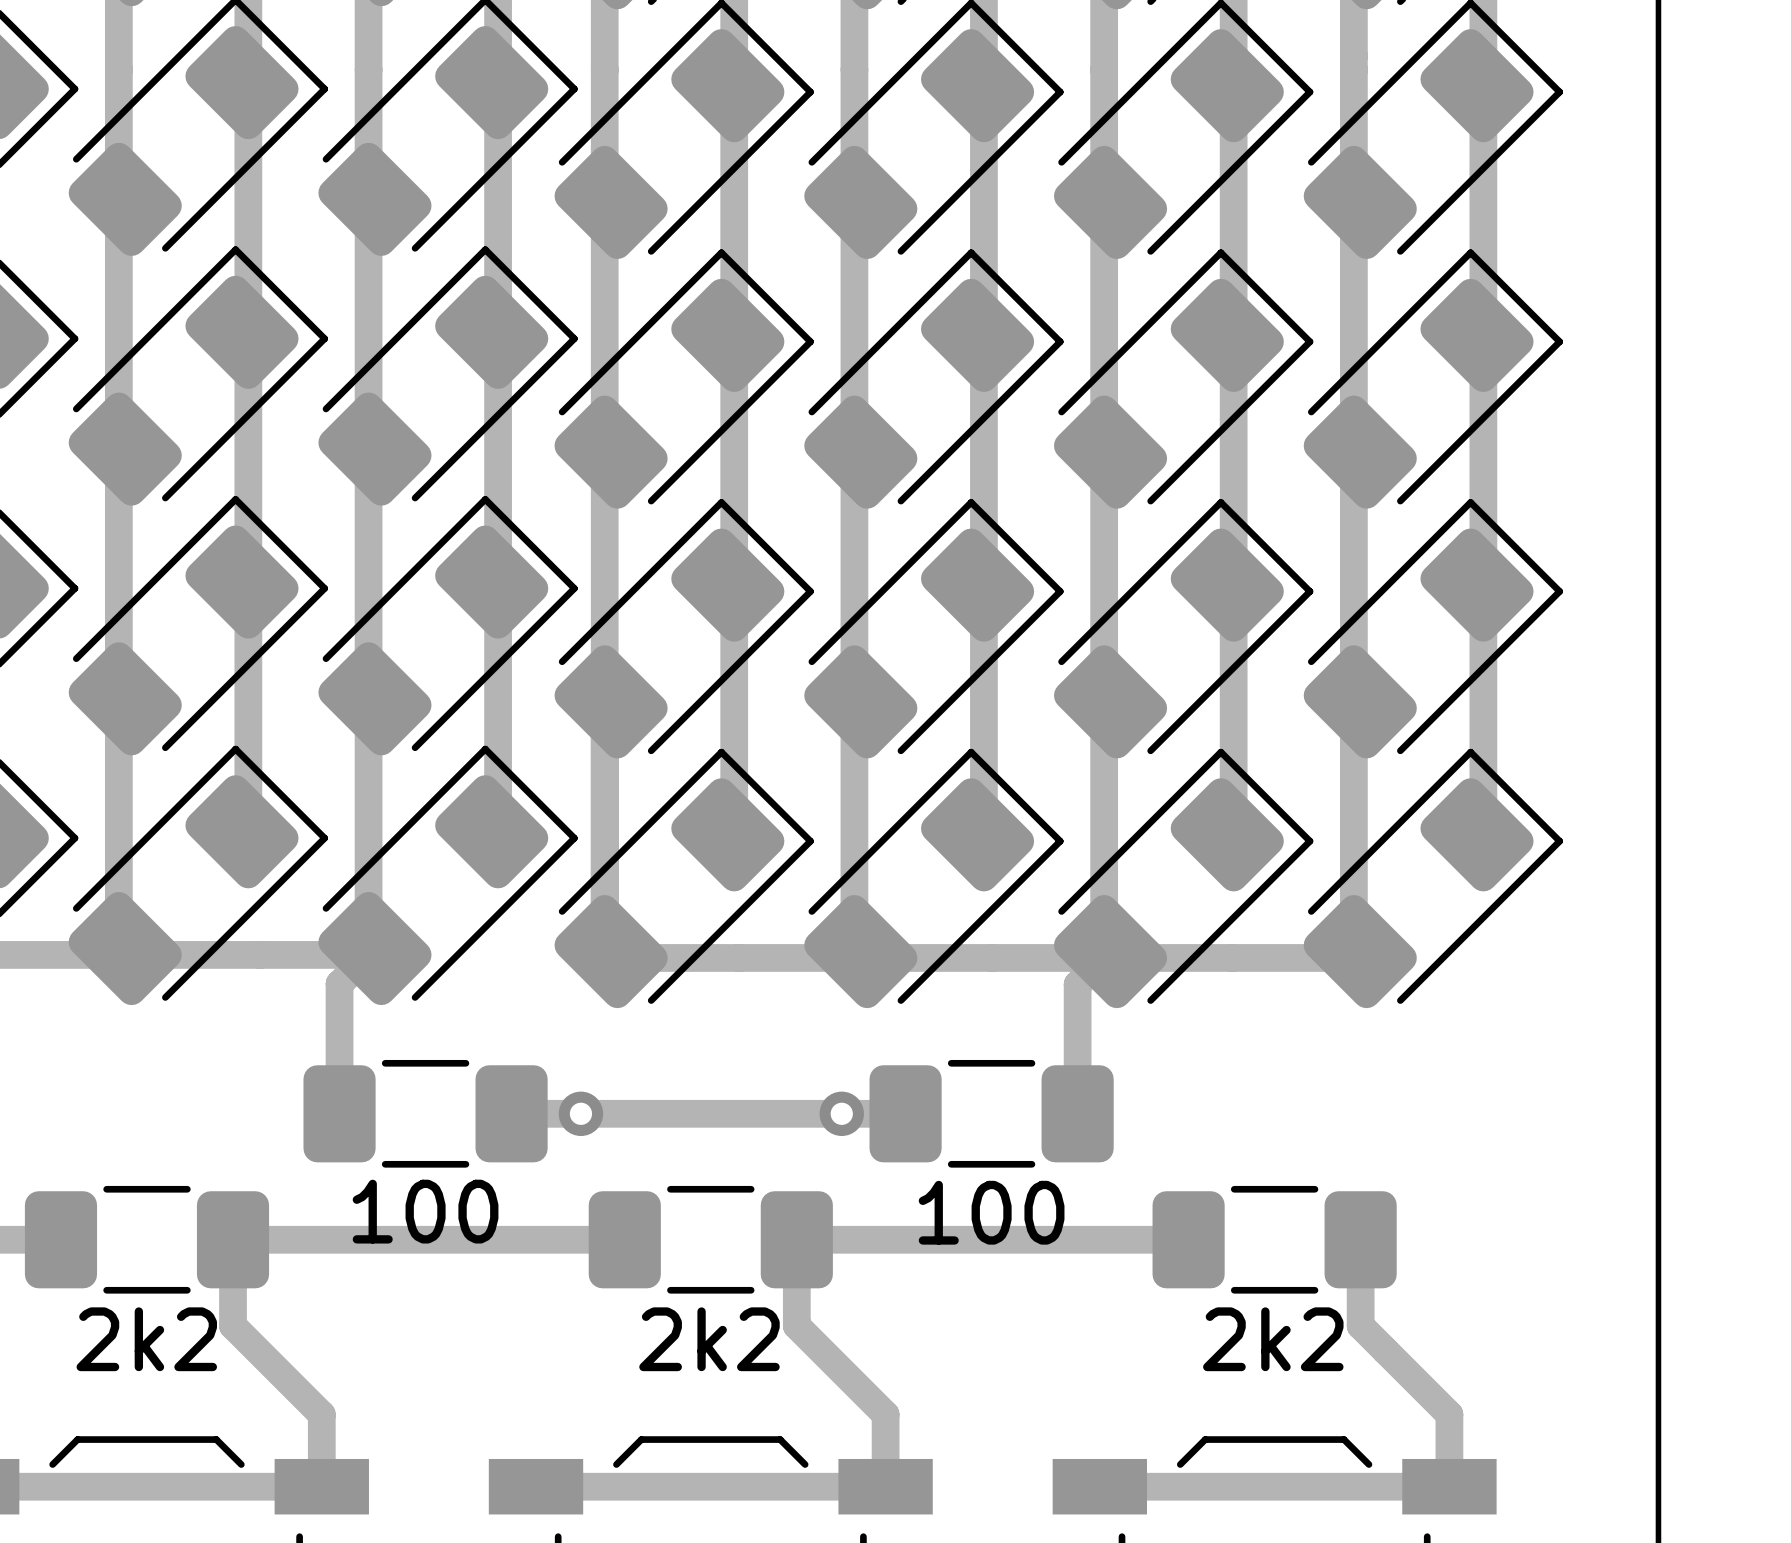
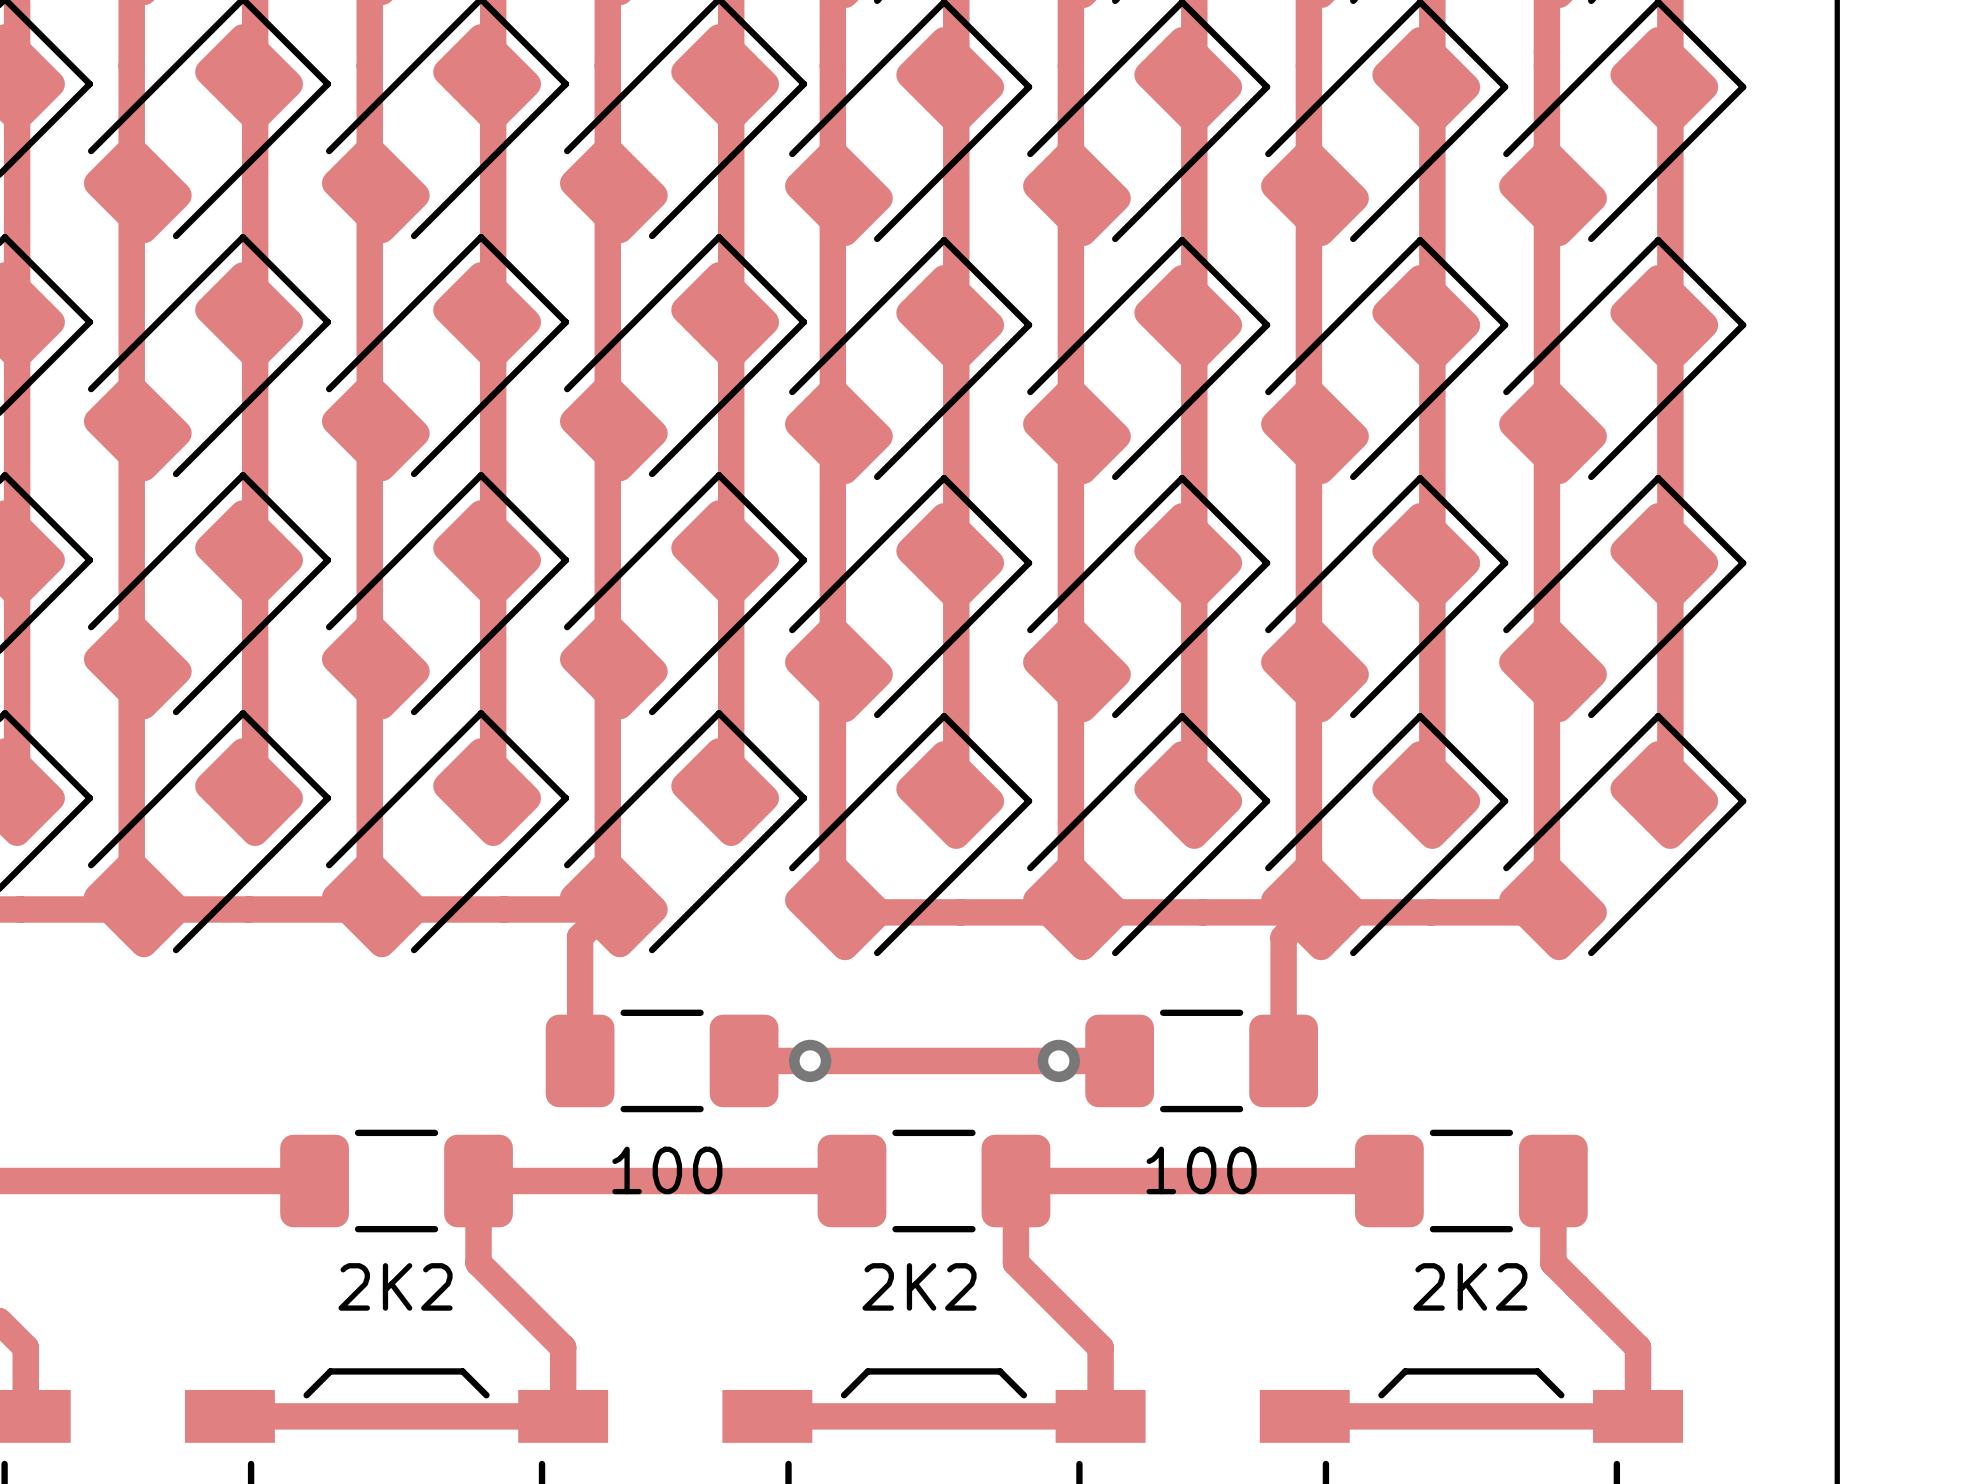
part value: 100 (425, 1211) -> none
part value: 100 (991, 1212) -> none
text: none -> 100 (667, 1170)
text: none -> 100 (1201, 1170)
part value: 2k2 (146, 1339) -> none
part value: 2k2 (709, 1339) -> none
part value: 2k2 (1273, 1339) -> none
text: none -> 2K2 (395, 1286)
text: none -> 2K2 (919, 1286)
text: none -> 2K2 (1470, 1286)

